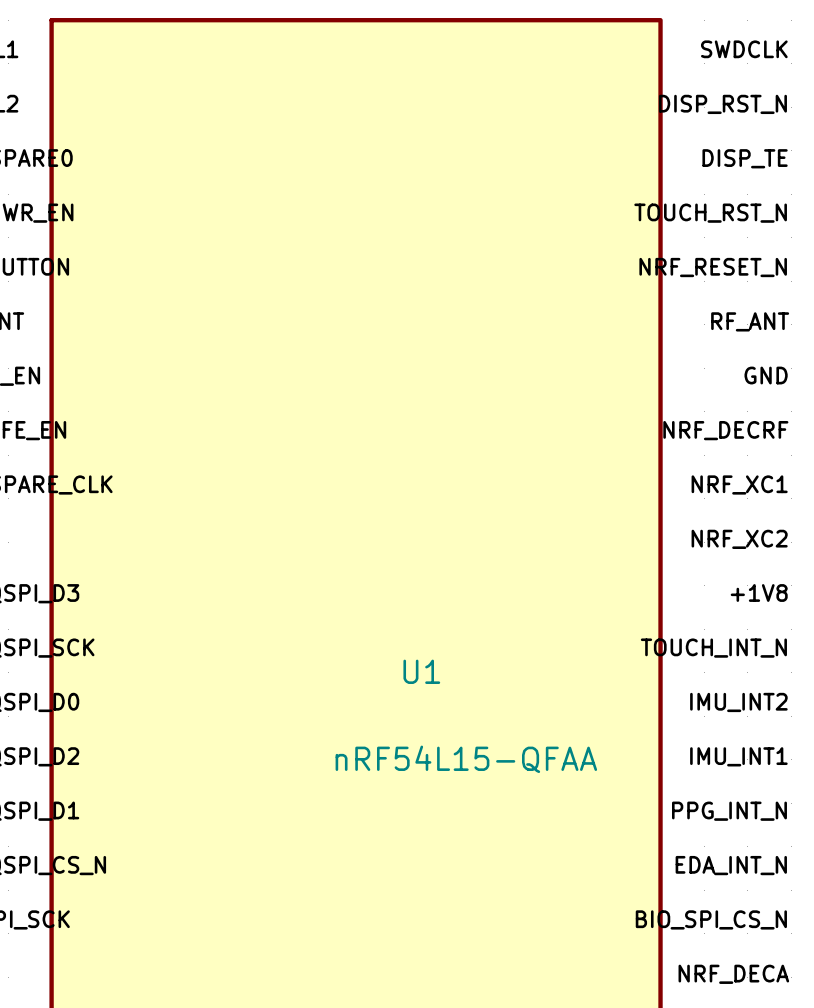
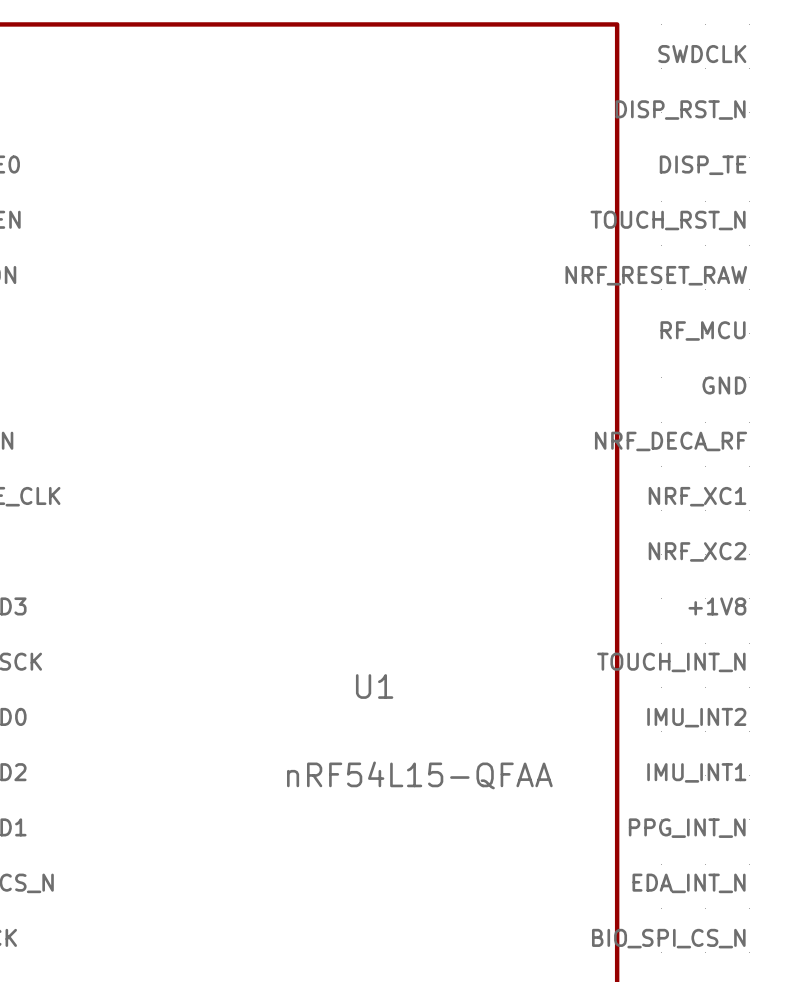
label: NRF_RESET_N (713, 267) -> NRF_RESET_RAW (656, 275)
label: RF_ANT (750, 321) -> RF_MCU (703, 330)
label: NRF_DECRF (725, 430) -> NRF_DECA_RF (671, 441)

